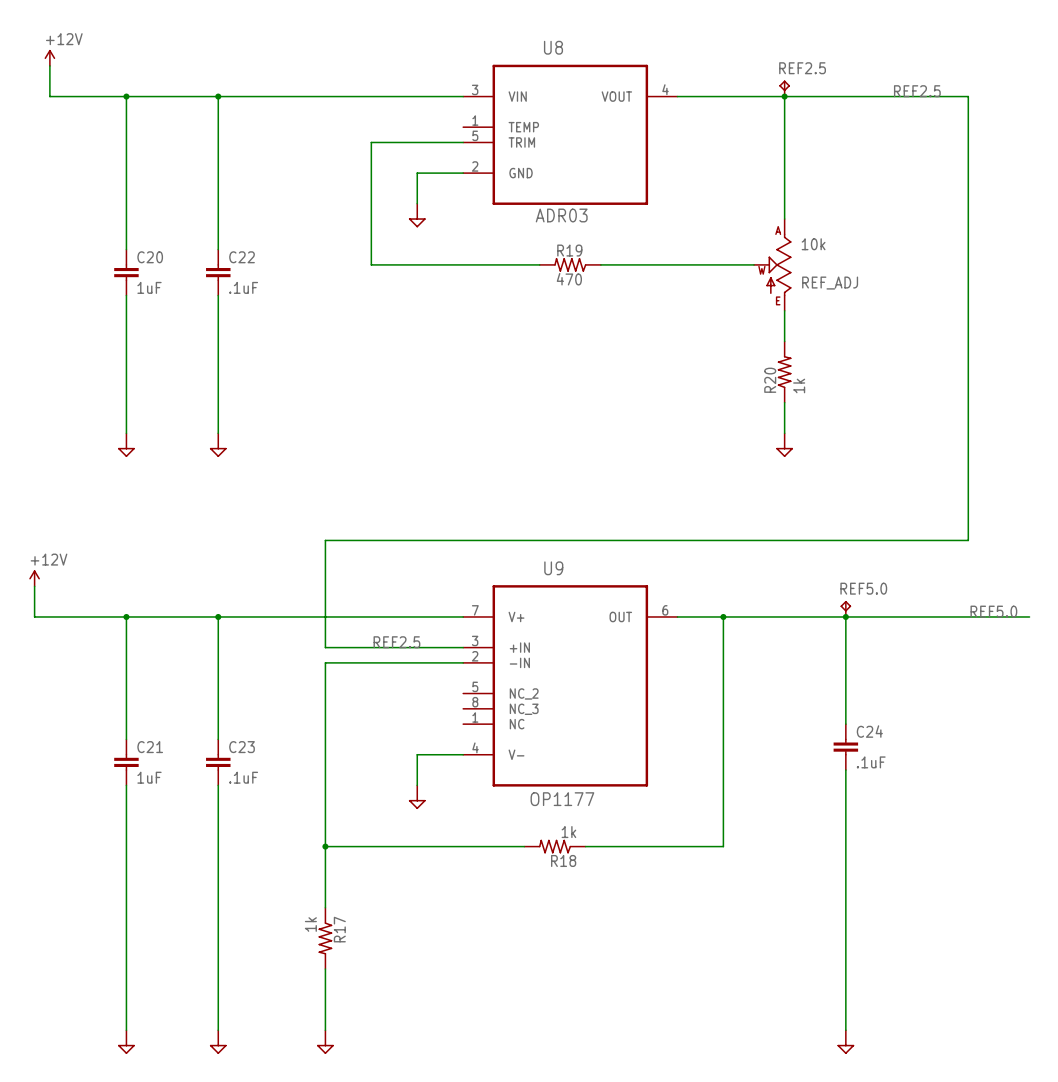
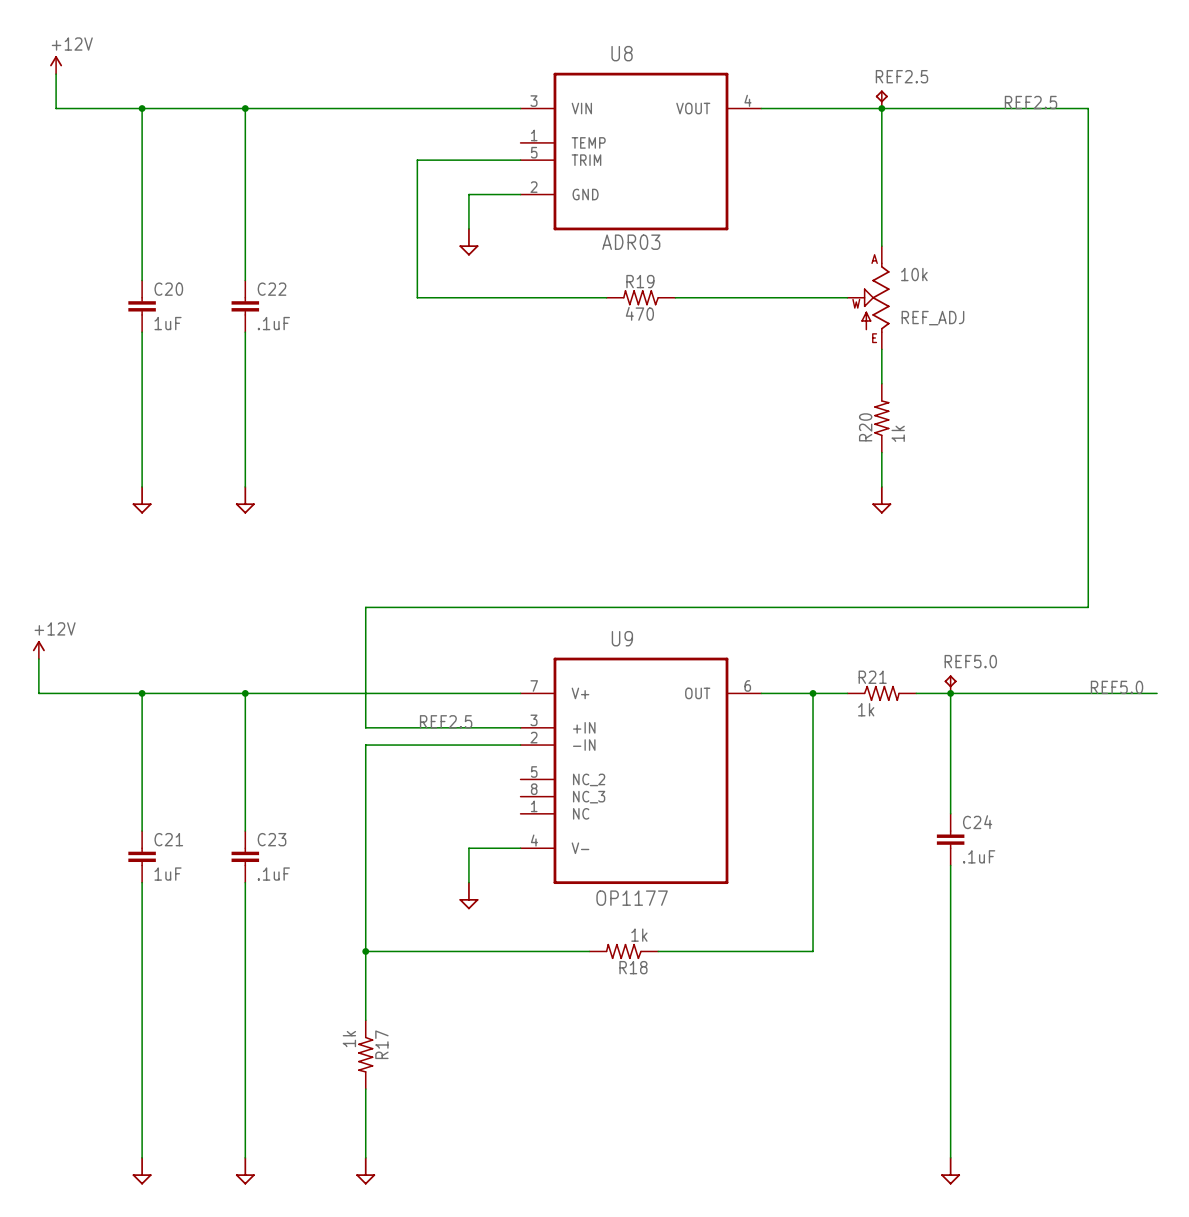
R21: none -> 1k (881, 693)

